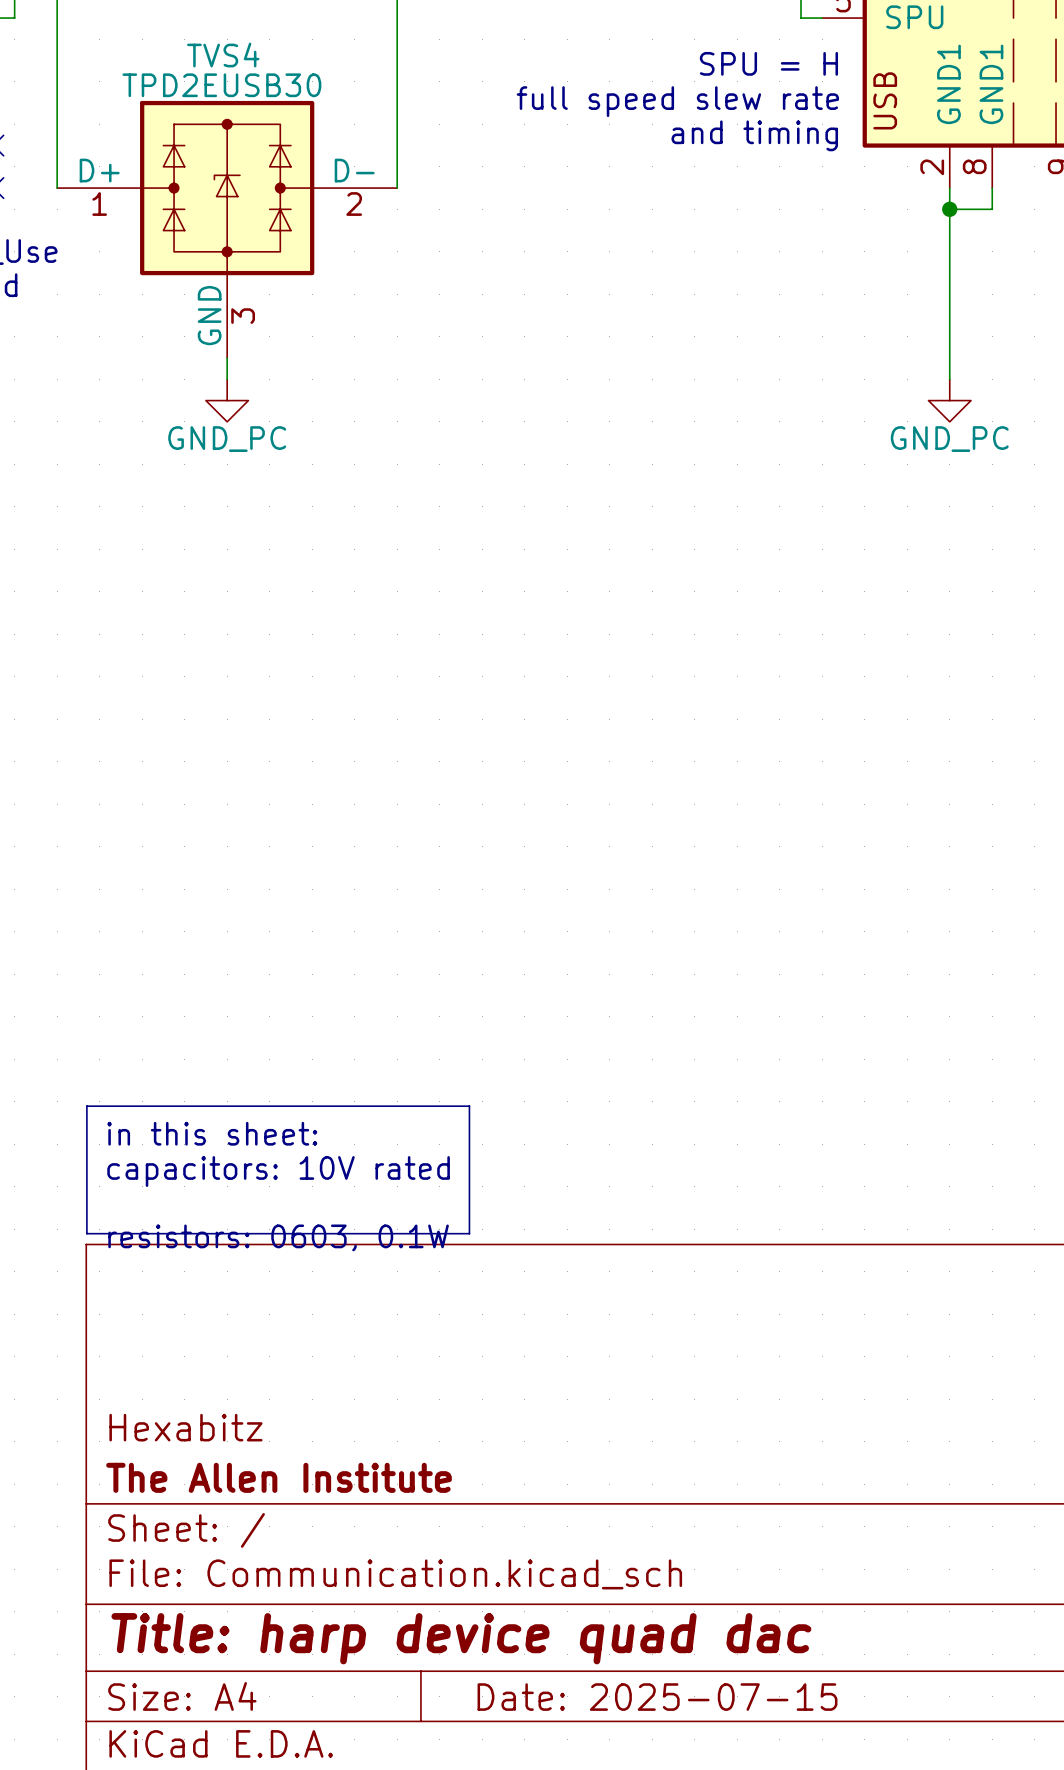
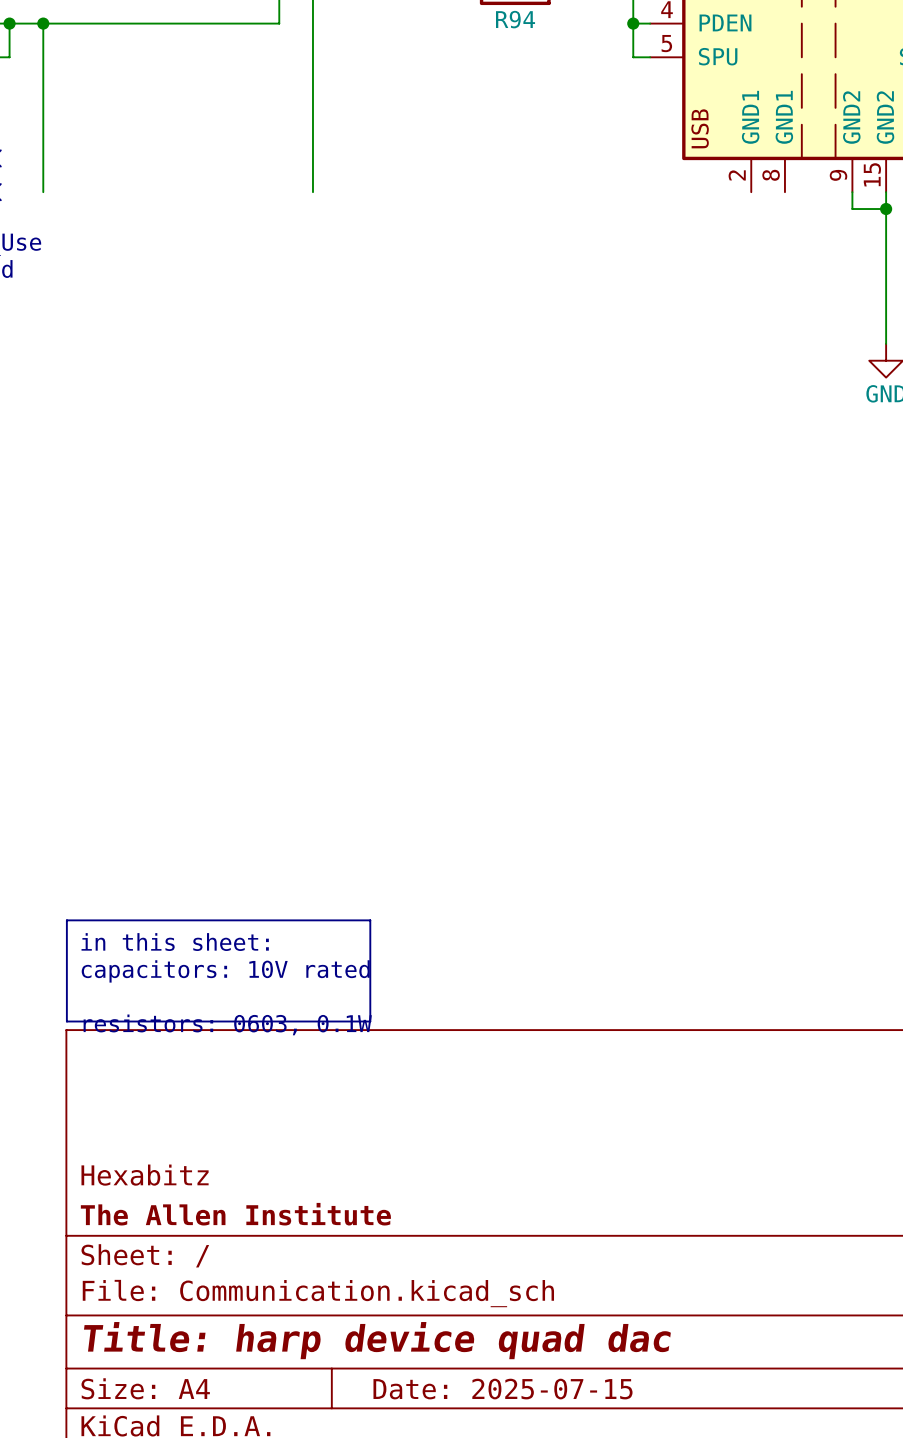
text: SPU = H (768, 63) -> none
text: full speed slew rate (677, 101) -> none
text: and timing (754, 135) -> none
wire: (949, 188) (949, 379) -> none
wire: (992, 188) (992, 209) (949, 209) -> none
junction: (949, 209) -> none
TVS4: TPD2EUSB30 (227, 229) -> none
wire: (227, 358) (227, 379) -> none
power symbol: GND_PC (227, 400) -> none
power symbol: GND_PC (949, 400) -> none

